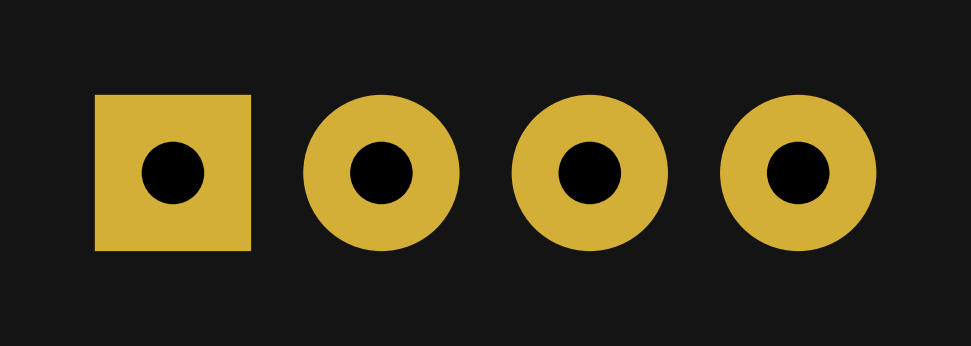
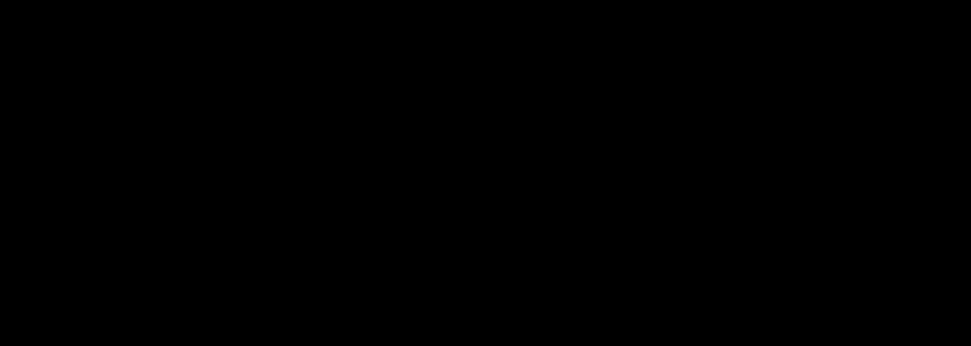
part: (485, 172) -> none

